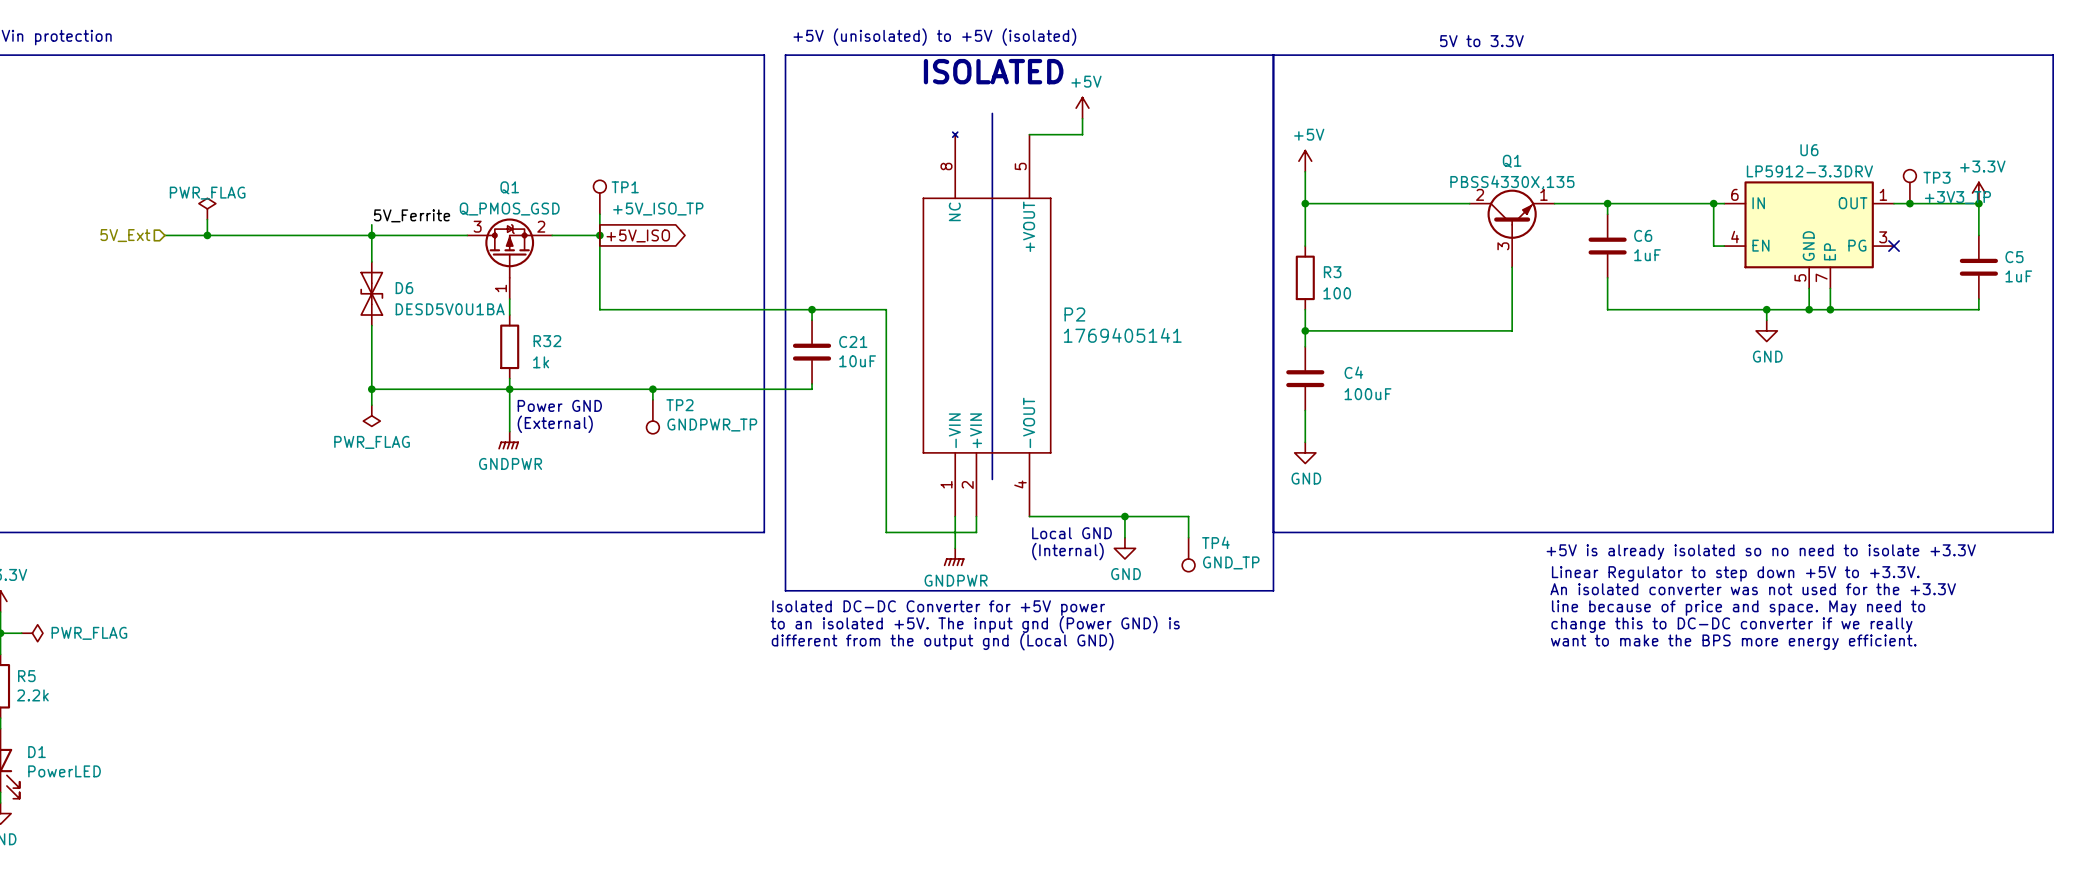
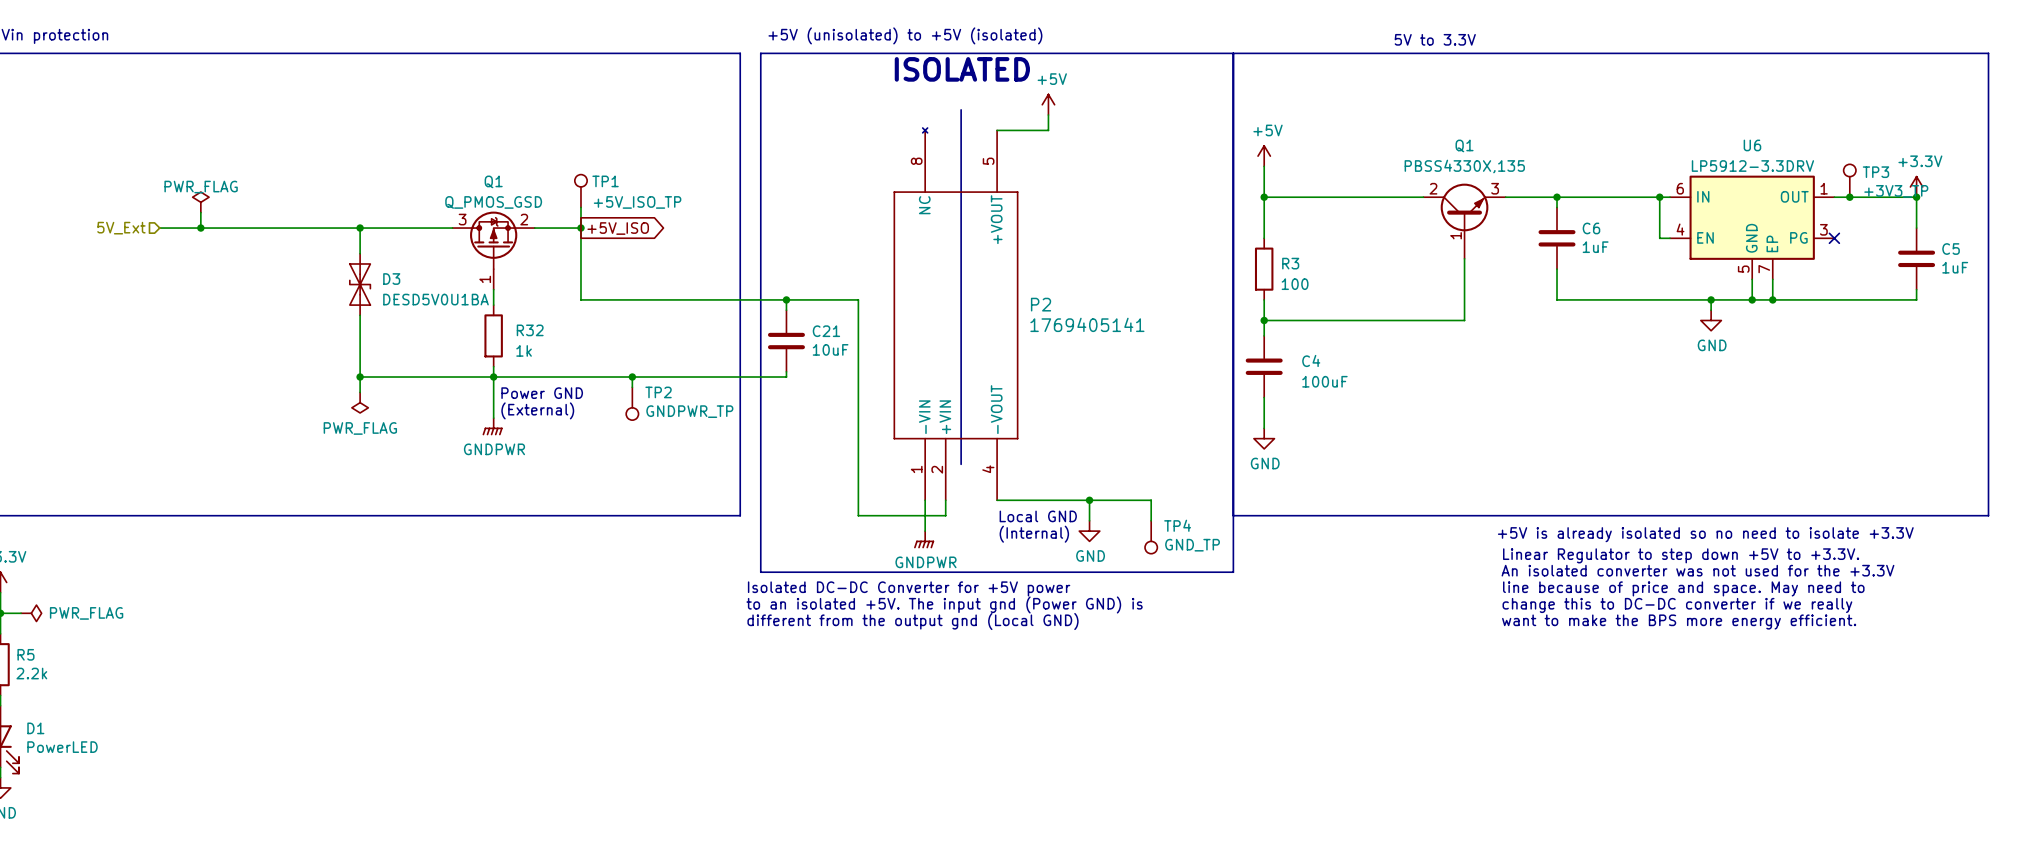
Q1 symbol: [1469, 189, 1555, 268] -> [1423, 183, 1506, 259]
label: 5V_Ferrite (412, 215) -> none
wire: (371, 224) (371, 235) -> none
D6 name: D6 (404, 288) -> D3 (391, 279)

